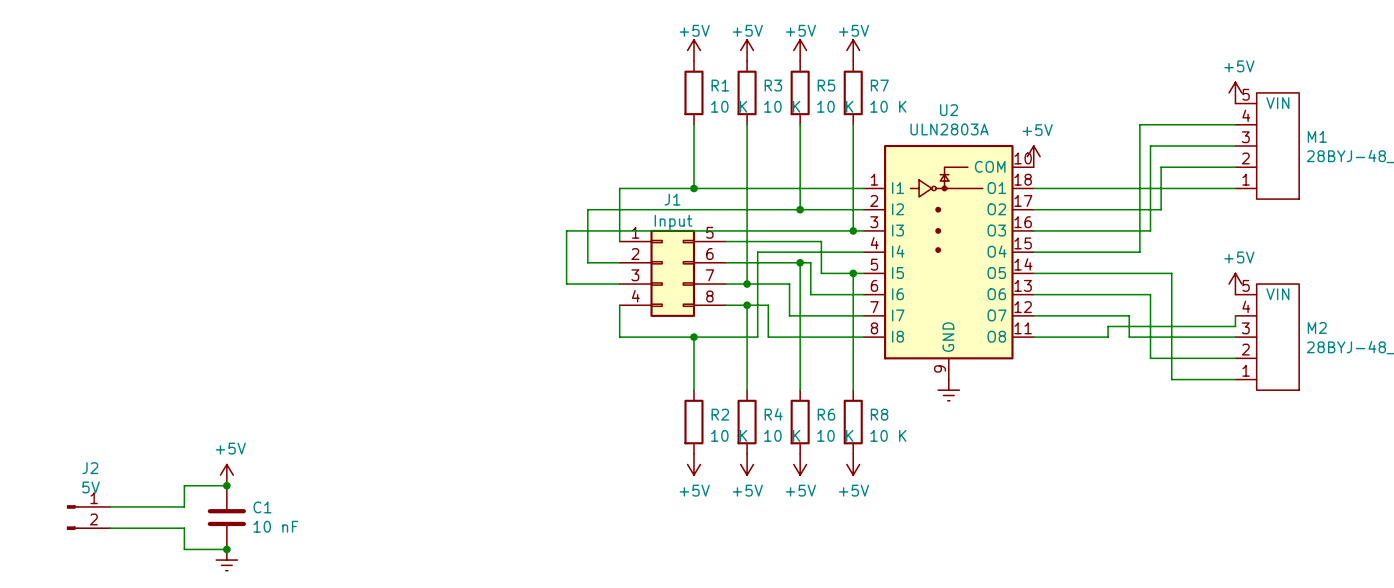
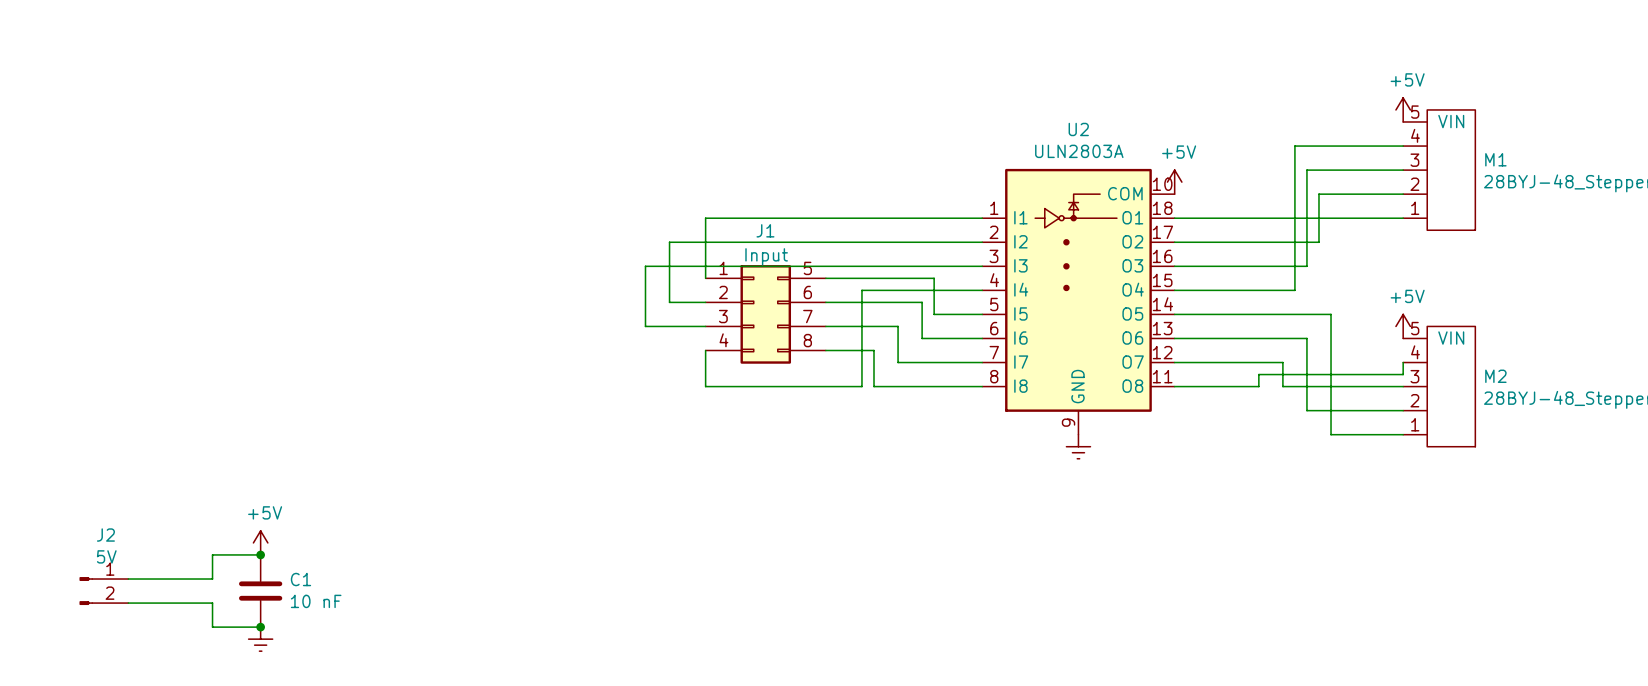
power symbol: +5V (693, 50) -> none
power symbol: +5V (747, 50) -> none
power symbol: +5V (800, 50) -> none
power symbol: +5V (853, 50) -> none
R1: 10 K (693, 92) -> none
R3: 10 K (747, 92) -> none
R5: 10 K (800, 92) -> none
R7: 10 K (853, 92) -> none
wire: (693, 124) (693, 188) -> none
wire: (747, 124) (747, 284) -> none
wire: (800, 124) (800, 209) -> none
wire: (853, 124) (853, 230) -> none
junction: (693, 188) -> none
junction: (800, 209) -> none
junction: (853, 230) -> none
wire: (800, 262) (800, 390) -> none
junction: (800, 262) -> none
wire: (853, 273) (853, 390) -> none
junction: (853, 273) -> none
junction: (747, 284) -> none
wire: (747, 305) (747, 390) -> none
junction: (747, 305) -> none
wire: (693, 337) (693, 390) -> none
junction: (693, 337) -> none
R2: 10 K (693, 422) -> none
R4: 10 K (747, 422) -> none
R6: 10 K (800, 422) -> none
R8: 10 K (853, 422) -> none
power symbol: +5V (693, 464) -> none
power symbol: +5V (747, 464) -> none
power symbol: +5V (800, 464) -> none
power symbol: +5V (853, 464) -> none

